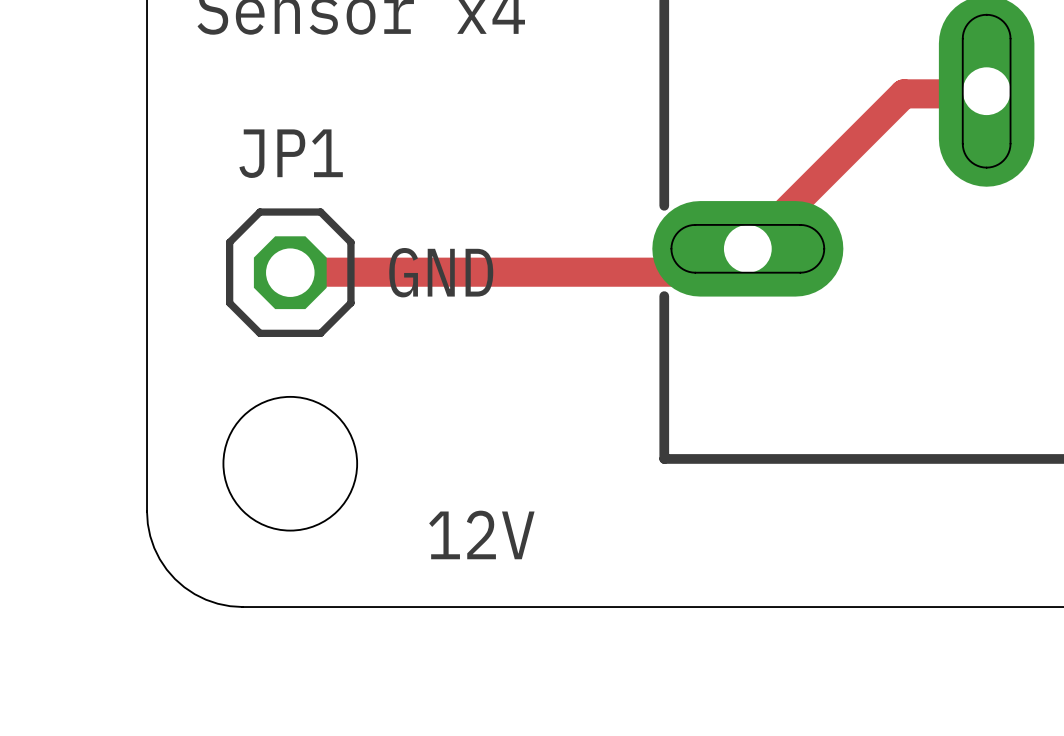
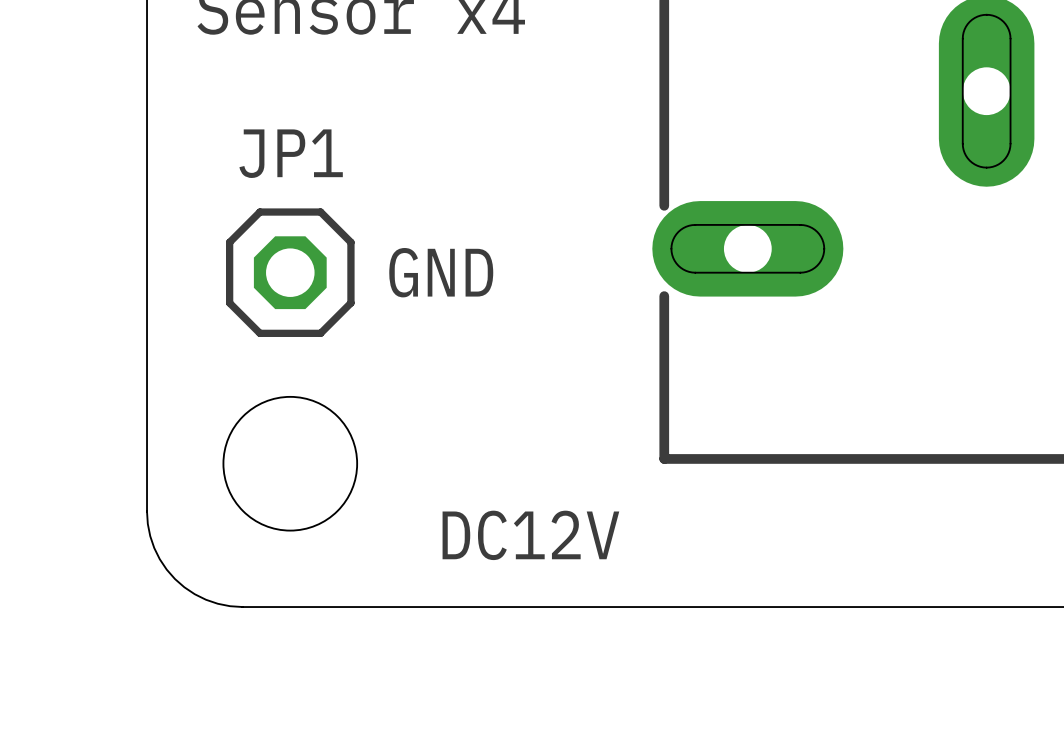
track: (986, 91) (984, 93) (904, 93) (725, 272) (290, 272) -> none
12V name: 12V (481, 534) -> DC12V (530, 535)

